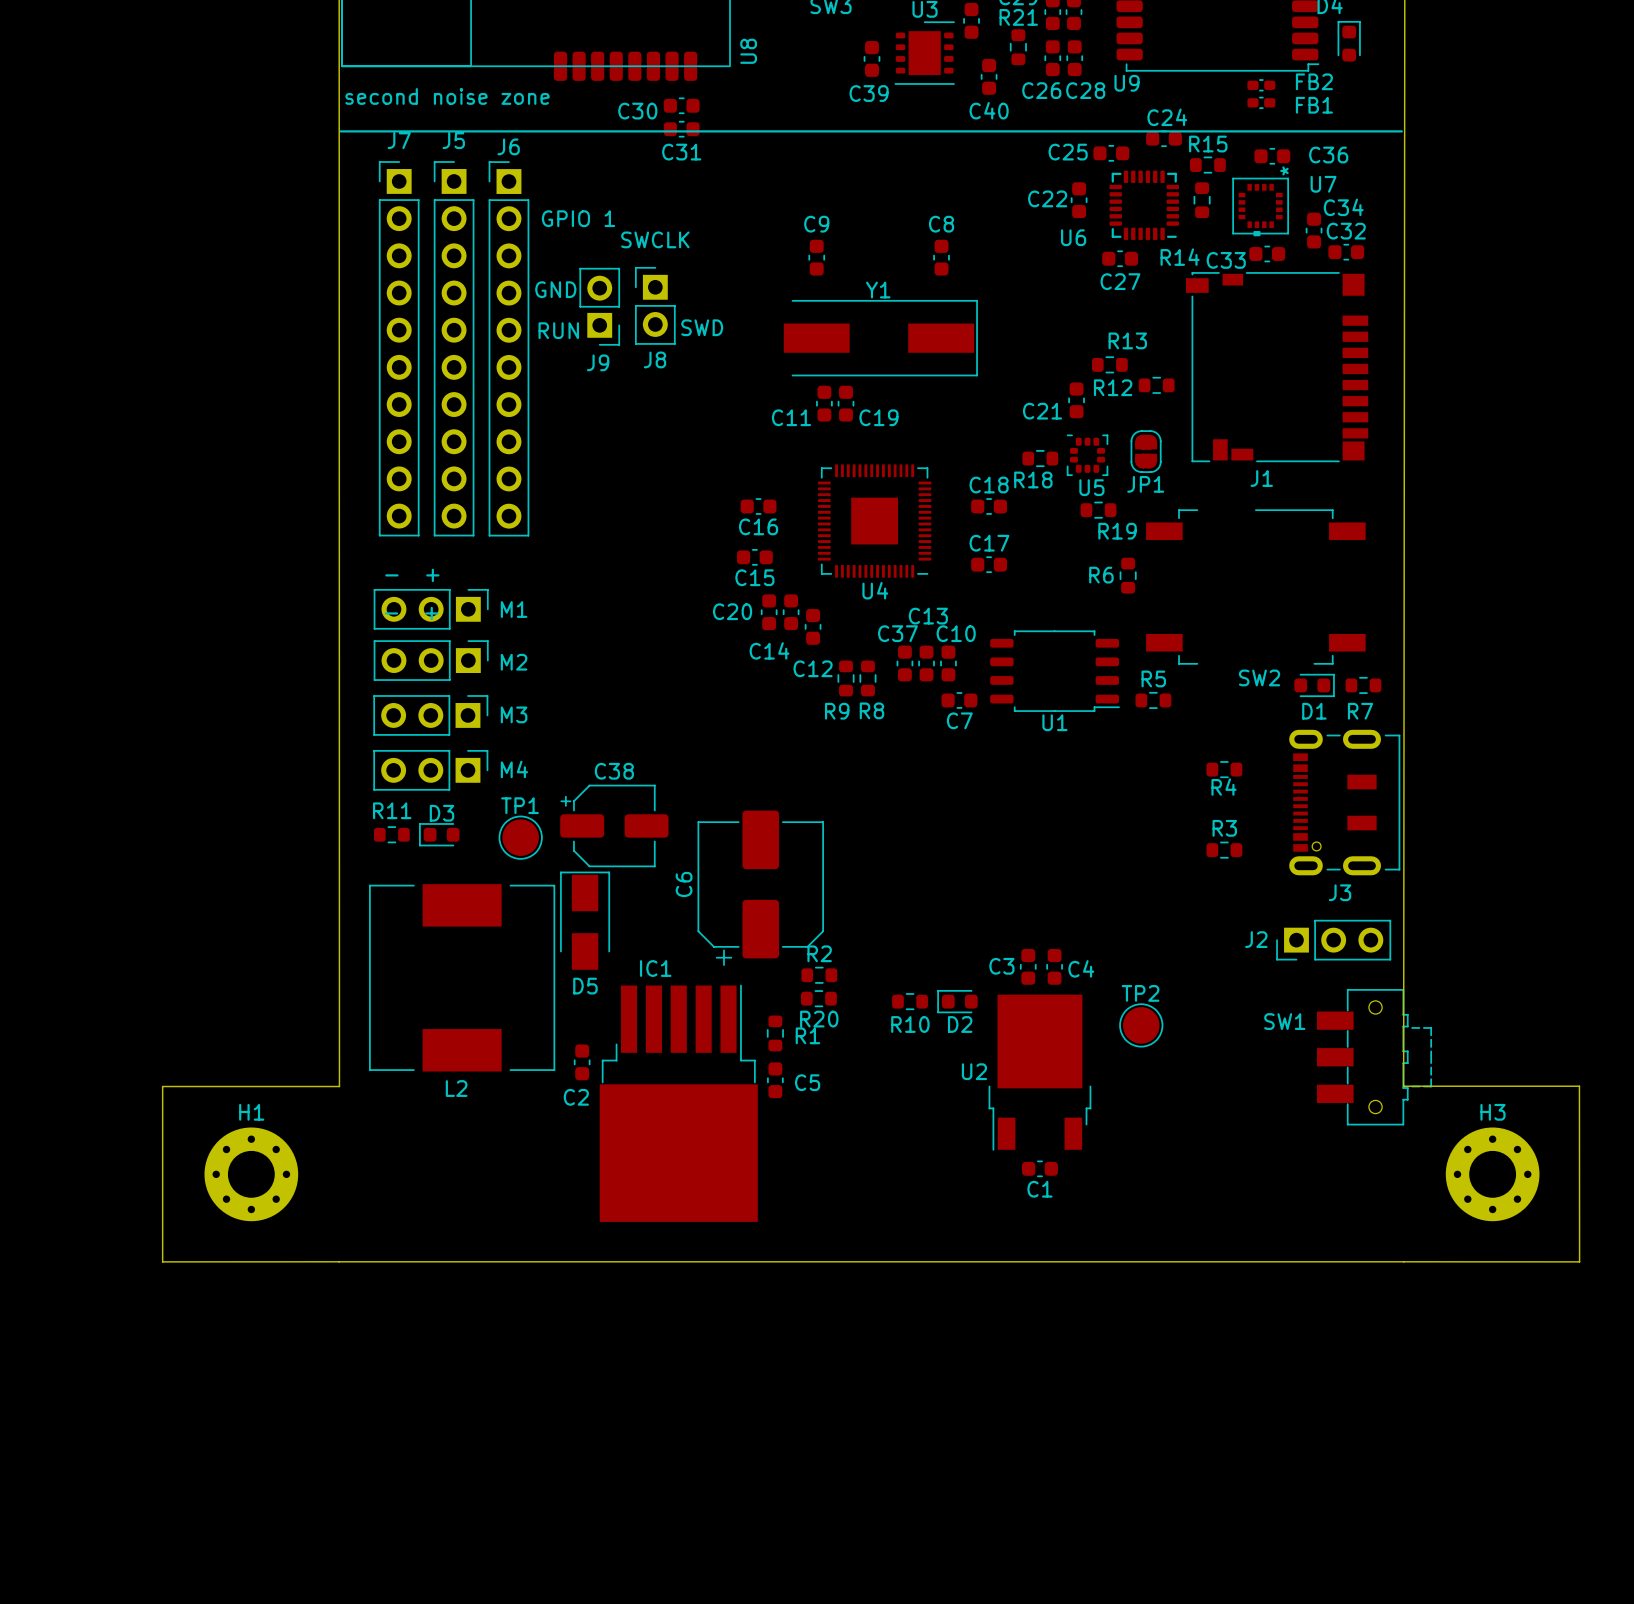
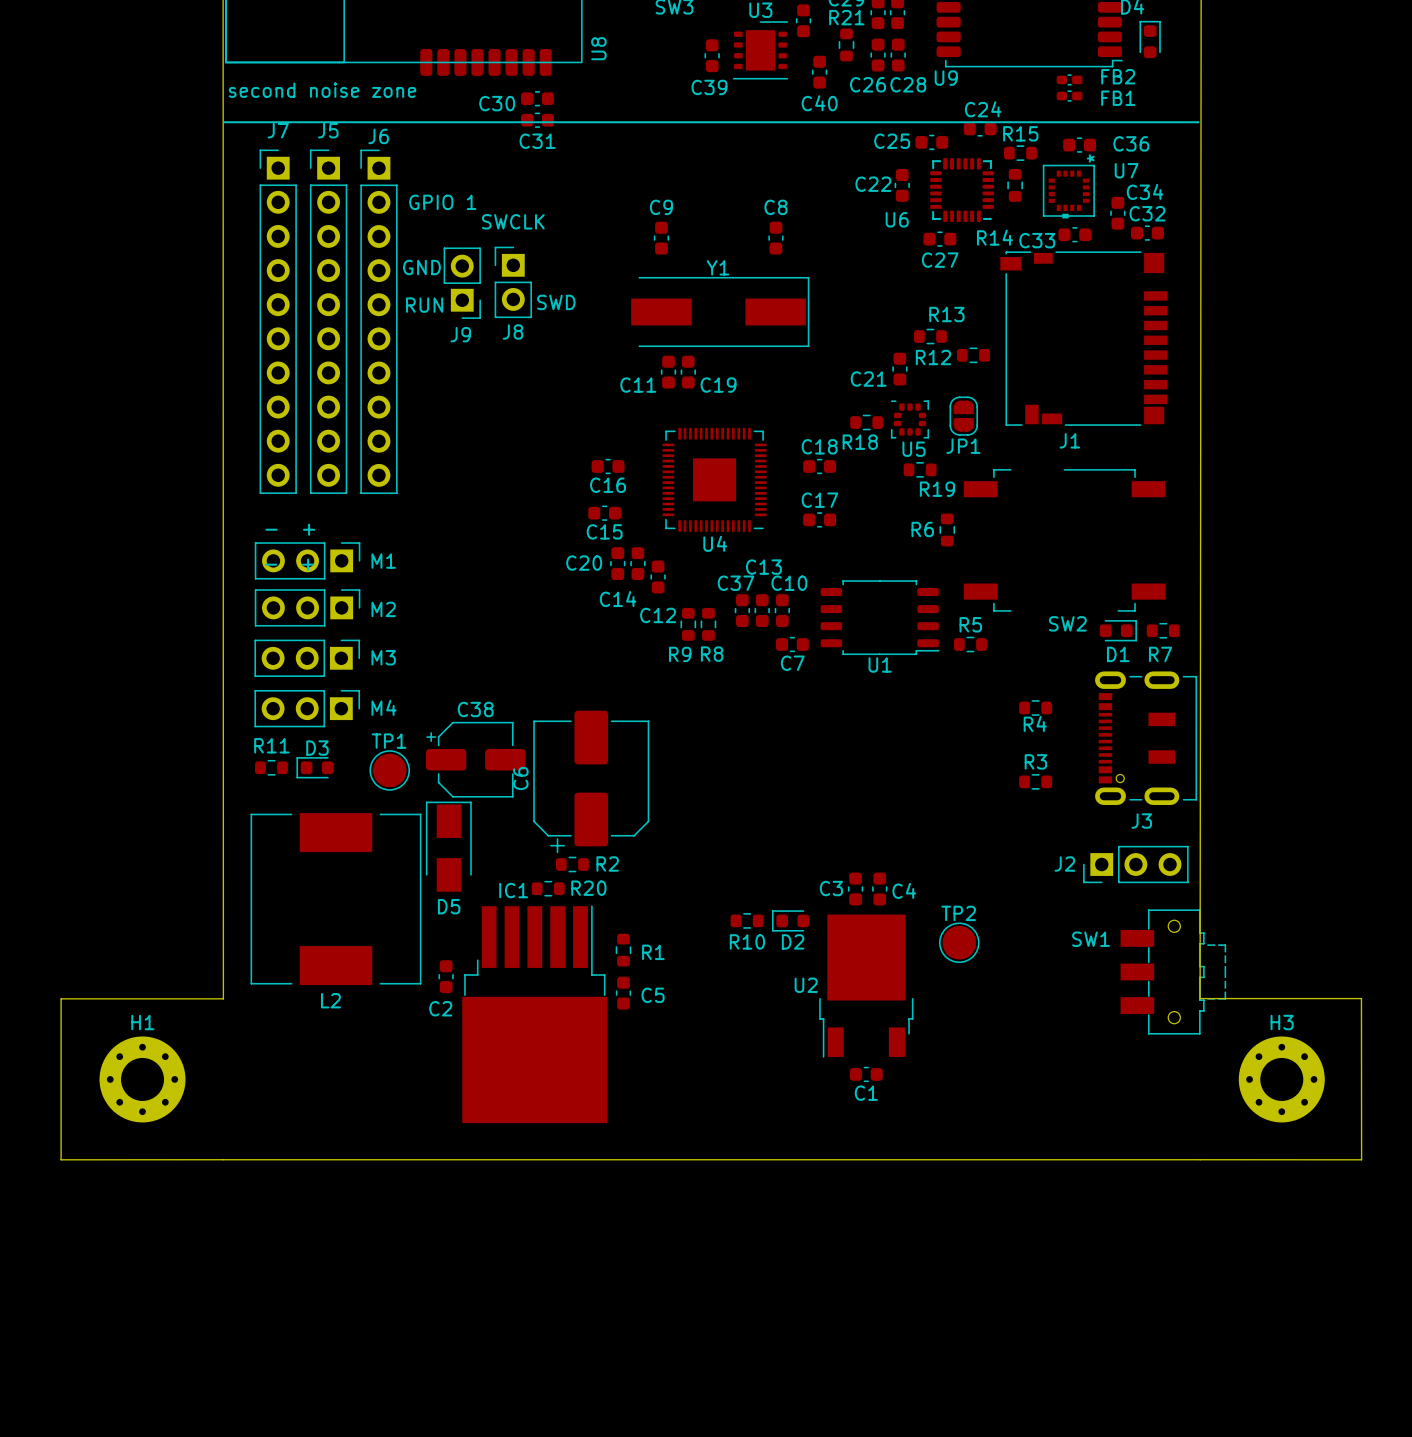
C6 position: (760, 888) -> (591, 781)
R2 name position: R2 (819, 953) -> R2 (607, 864)
R2 position: (819, 975) -> (572, 864)
R20 position: (818, 998) -> (548, 888)
R20 name position: R20 (819, 1019) -> R20 (588, 888)

